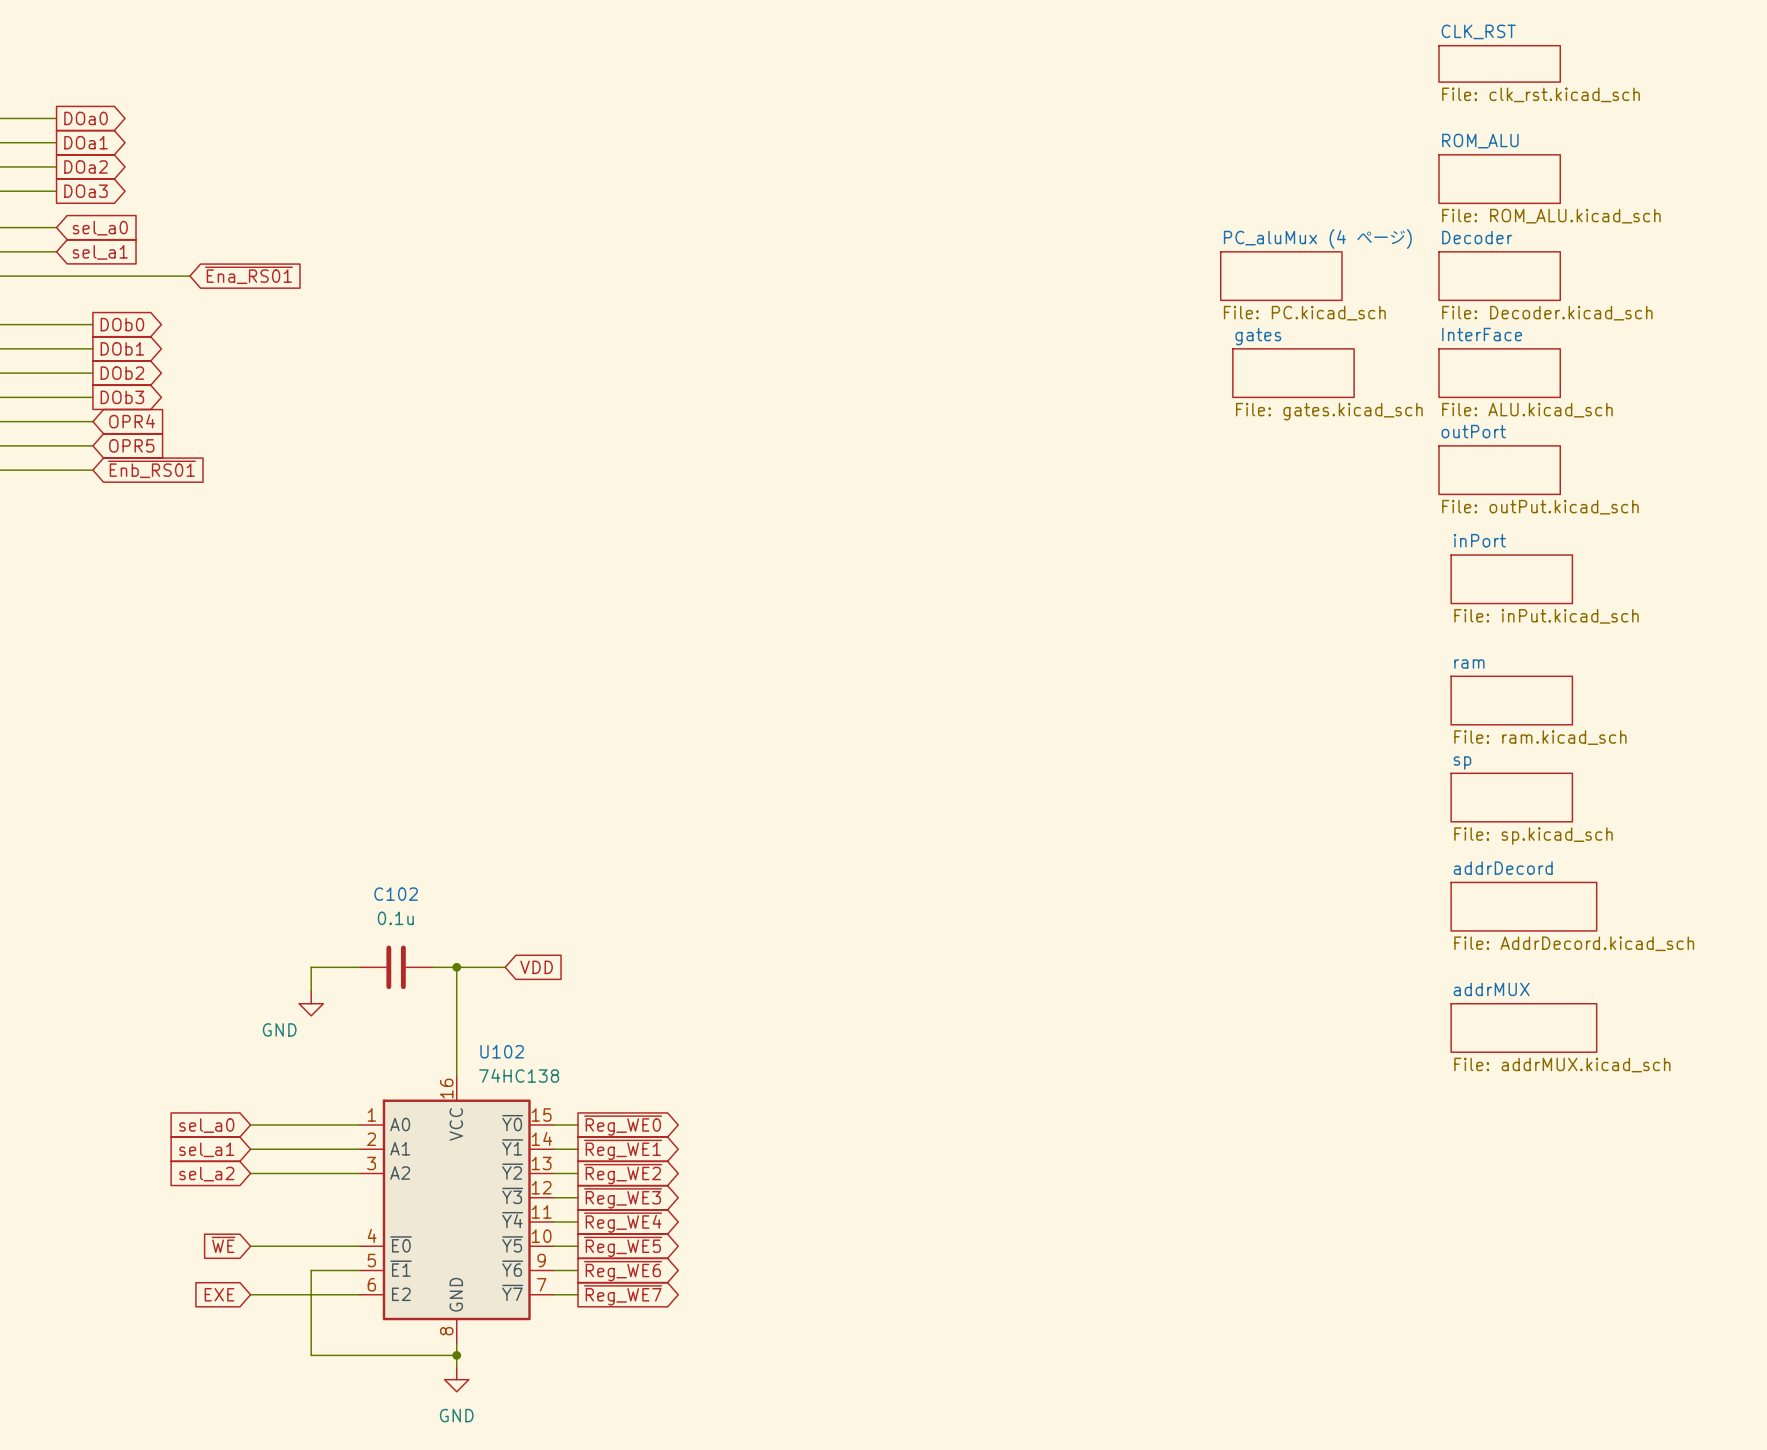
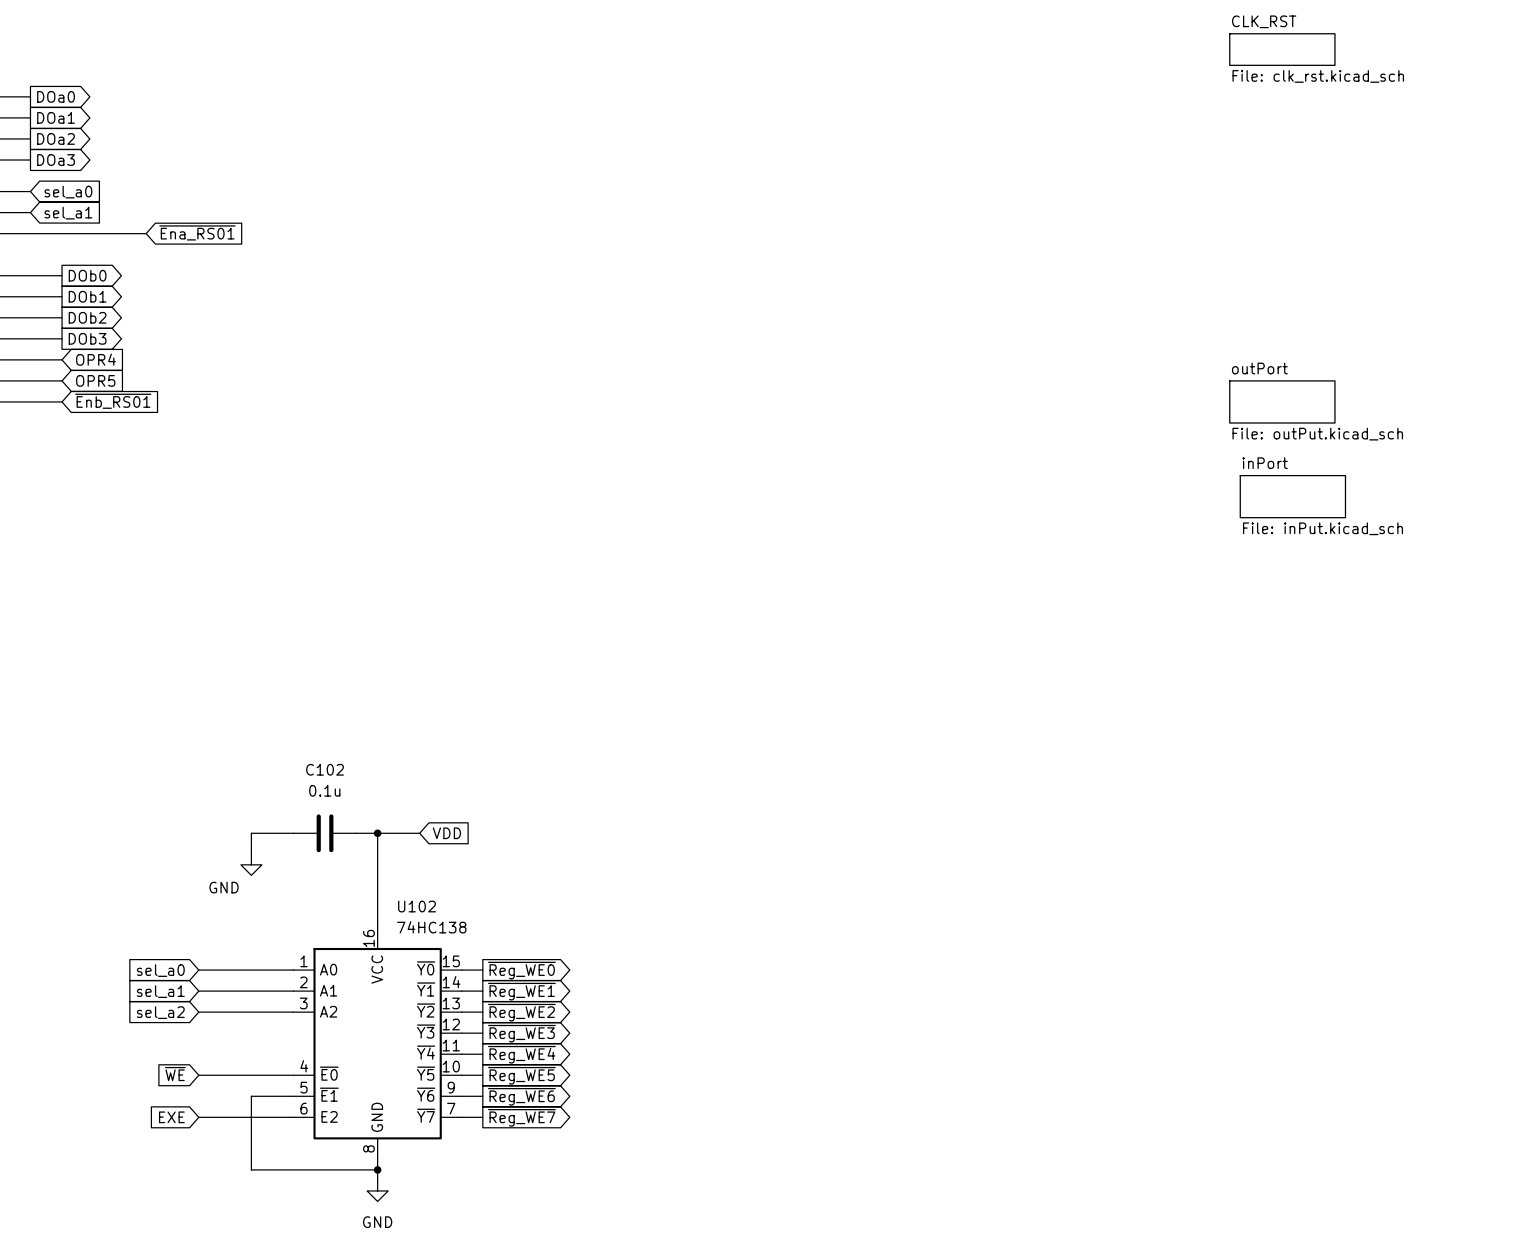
sheet ROM_ALU: File: ROM_ALU.kicad_sch (1499, 179) -> none
sheet PC_aluMux (4 ページ): File: PC.kicad_sch (1281, 276) -> none
sheet Decoder: File: Decoder.kicad_sch (1499, 276) -> none
sheet gates: File: gates.kicad_sch (1293, 373) -> none
sheet InterFace: File: ALU.kicad_sch (1499, 373) -> none
sheet ram: File: ram.kicad_sch (1511, 700) -> none
sheet sp: File: sp.kicad_sch (1511, 797) -> none
sheet addrDecord: File: AddrDecord.kicad_sch (1523, 906) -> none
sheet addrMUX: File: addrMUX.kicad_sch (1523, 1027) -> none

